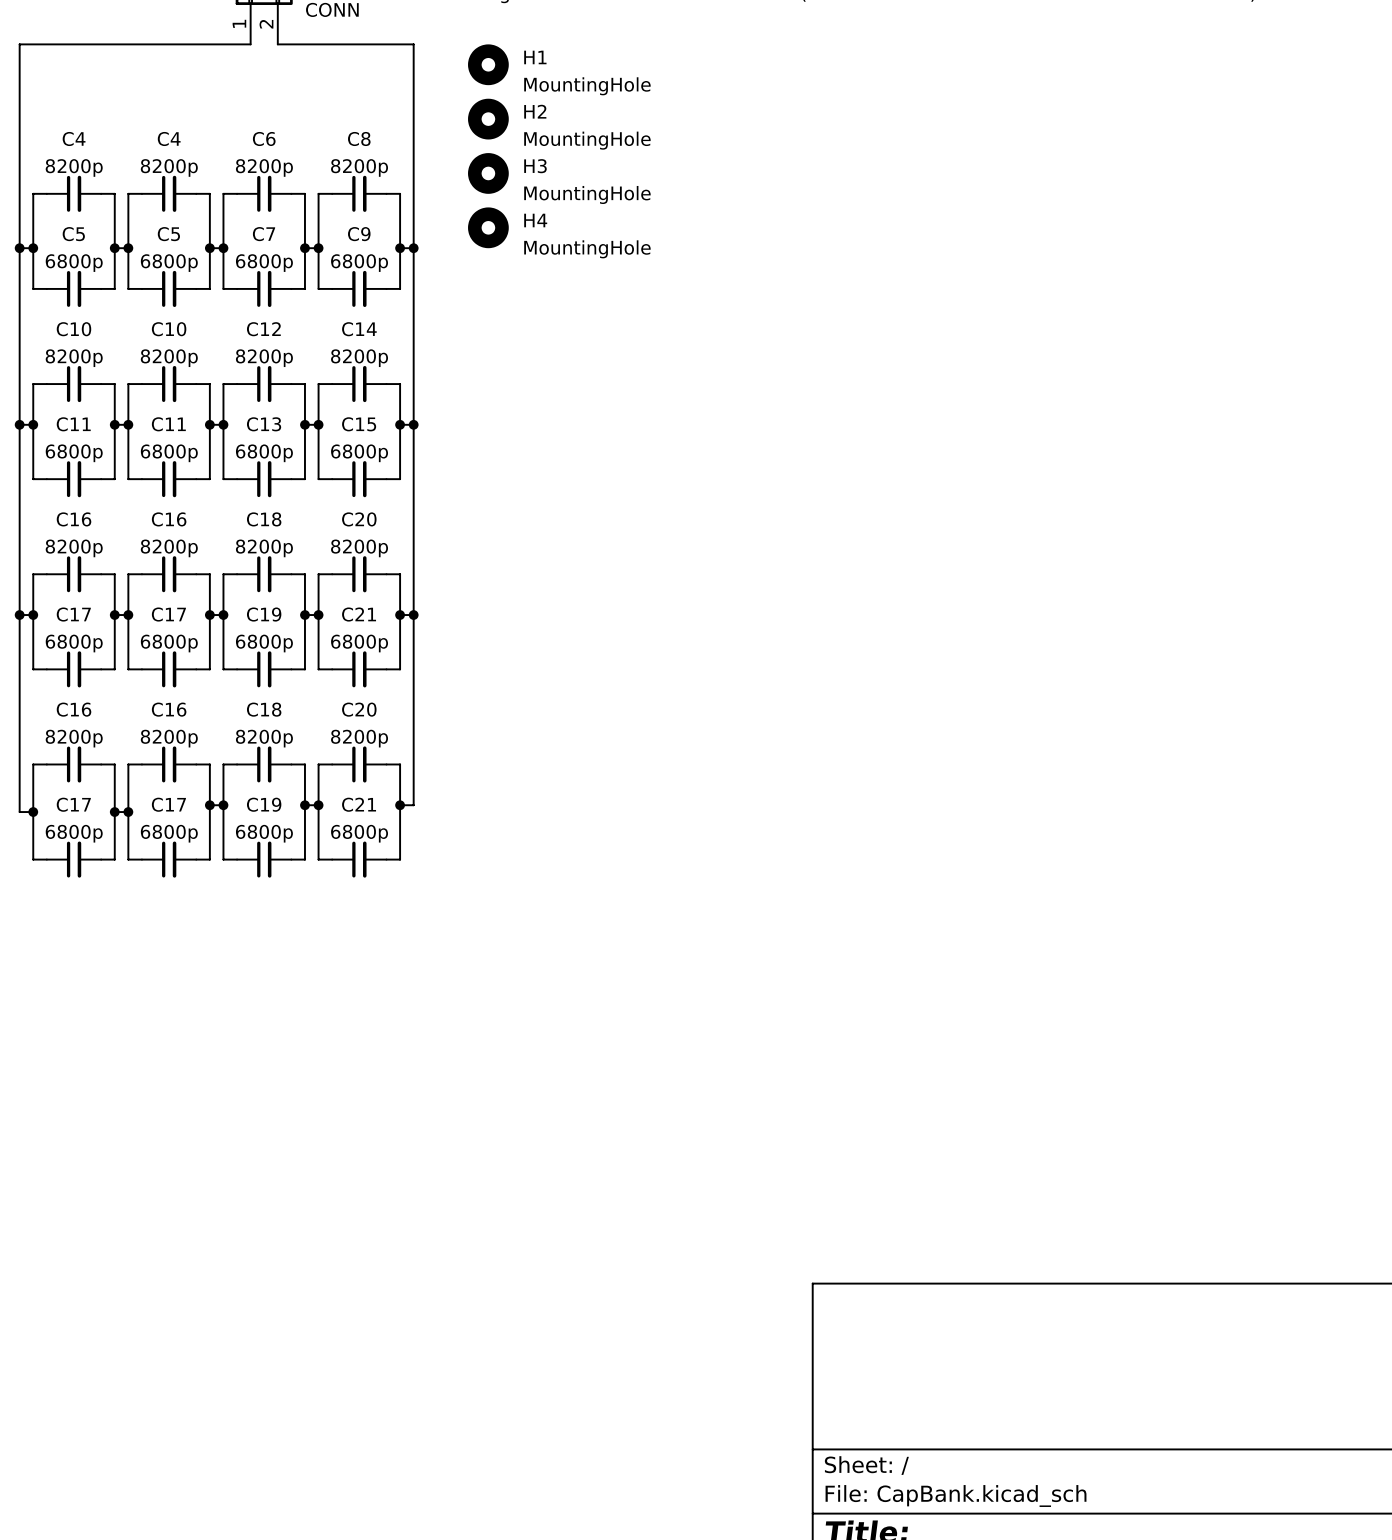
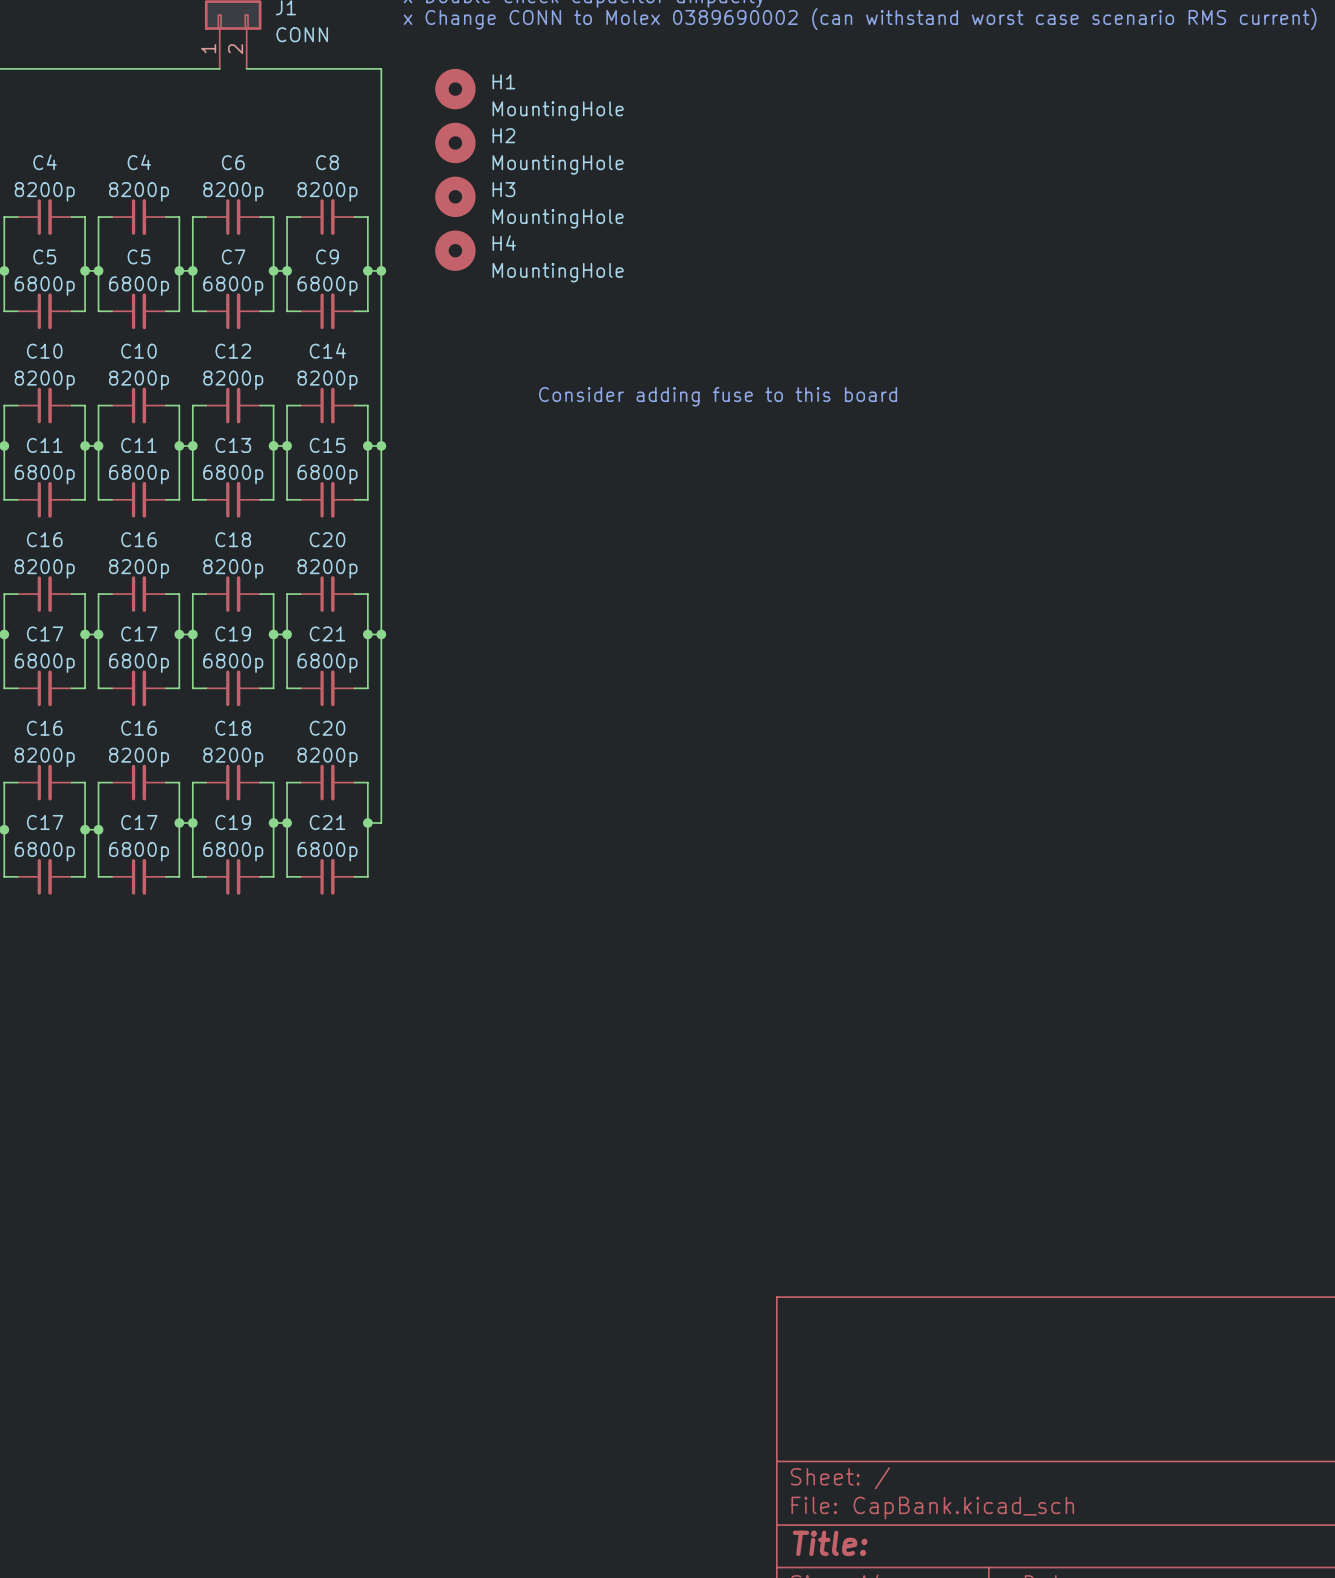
text: none -> Consider adding fuse to this board (718, 396)

